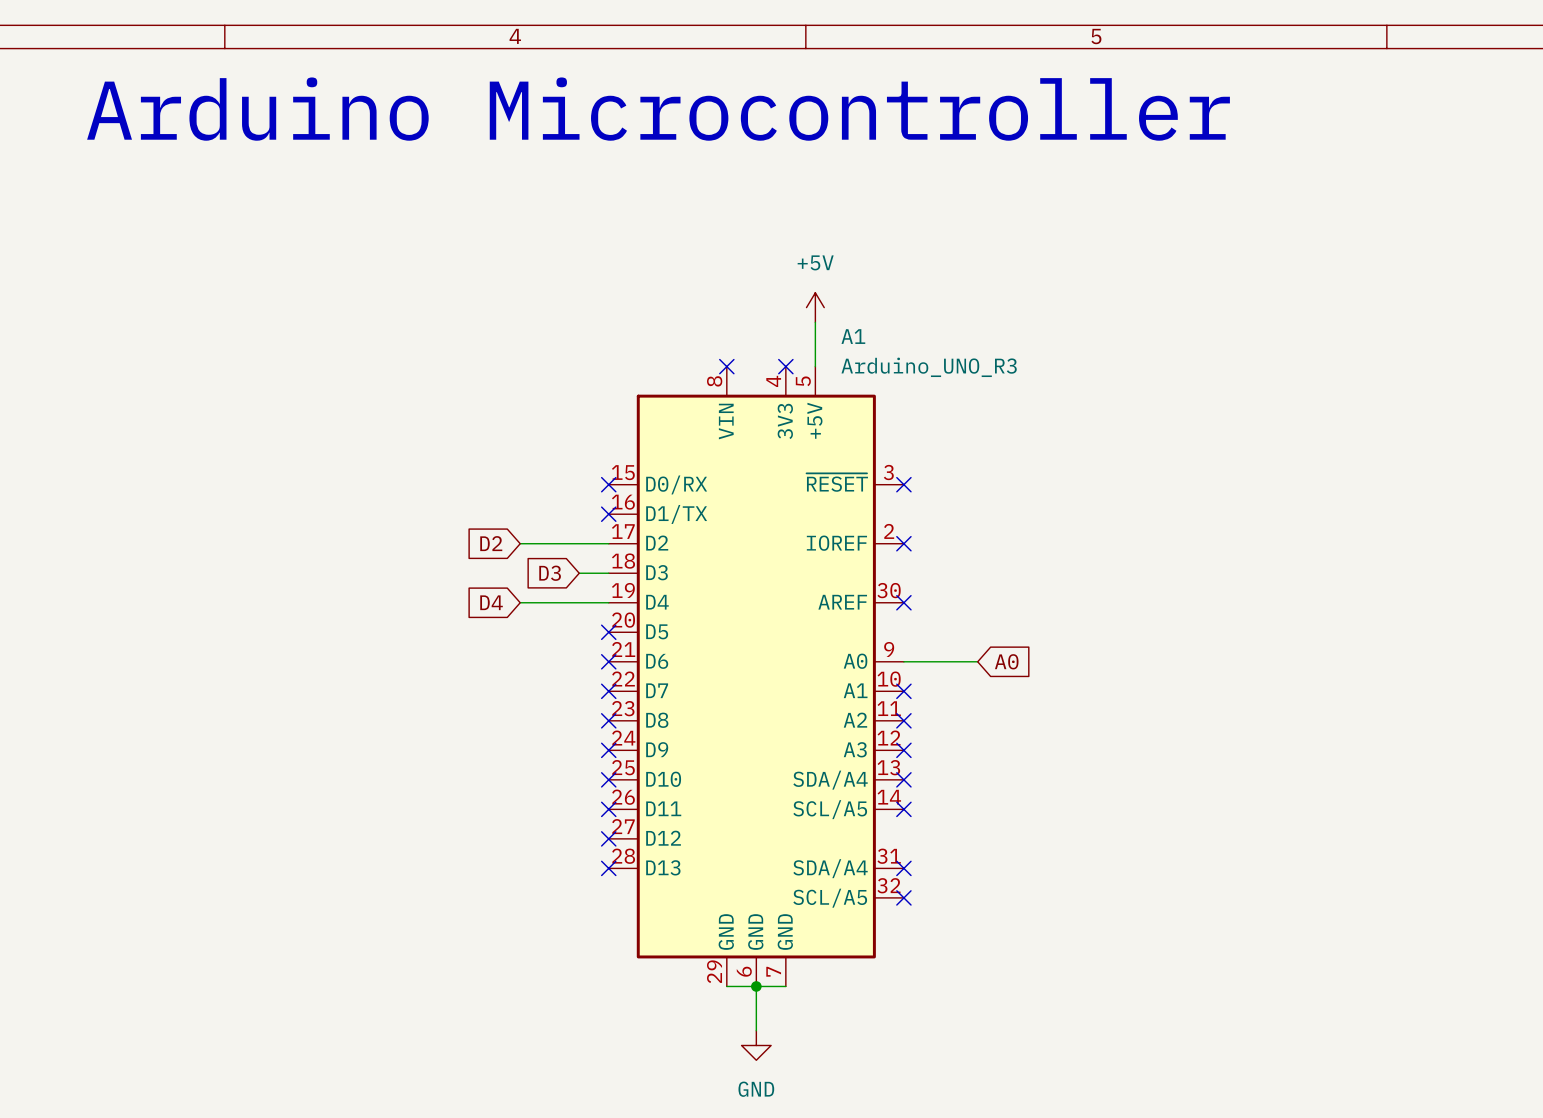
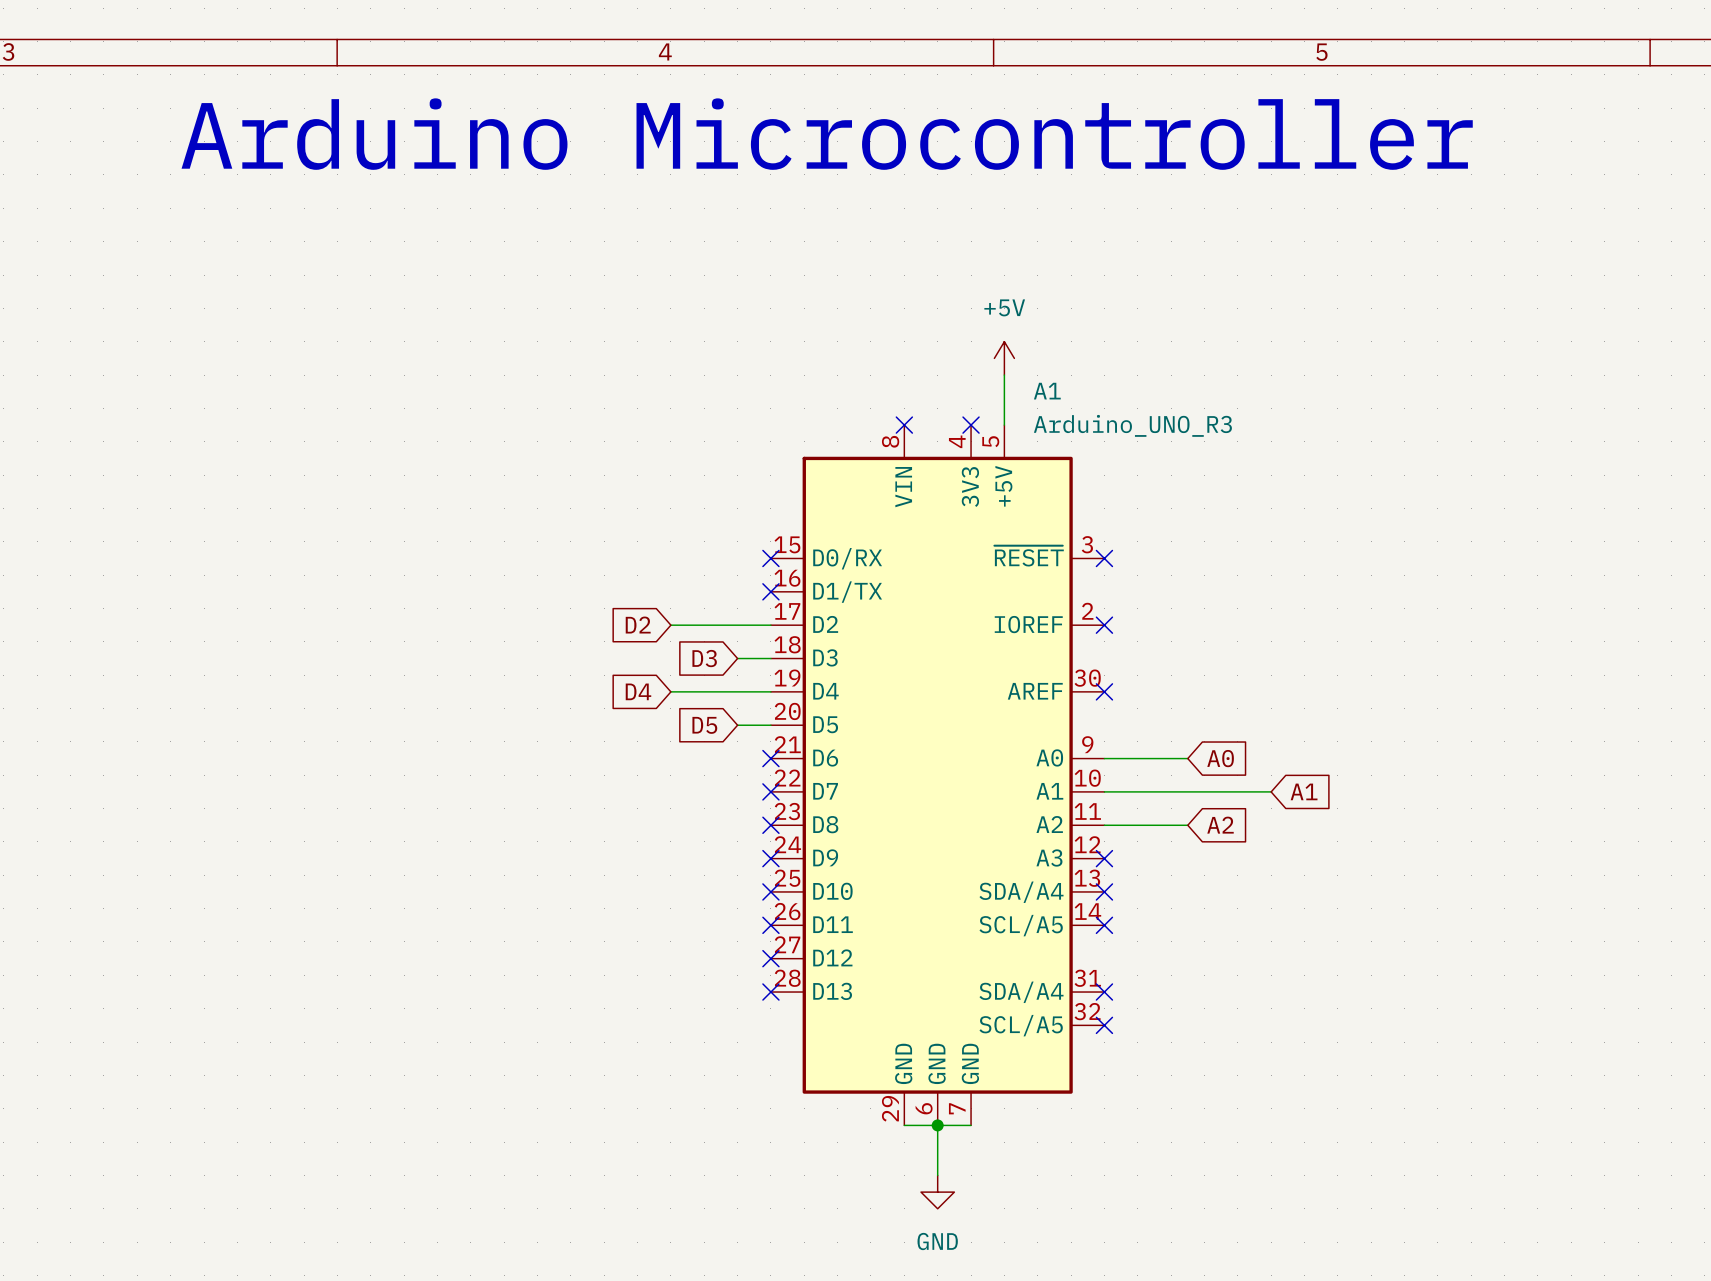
global label: none -> D5 (704, 725)
wire: none -> (737, 725) (770, 725)
no-connect mark: (608, 632) -> none
wire: none -> (1104, 791) (1271, 791)
no-connect mark: (903, 691) -> none
global label: none -> A1 (1304, 791)
wire: none -> (1104, 825) (1187, 825)
no-connect mark: (903, 720) -> none
global label: none -> A2 (1220, 825)

